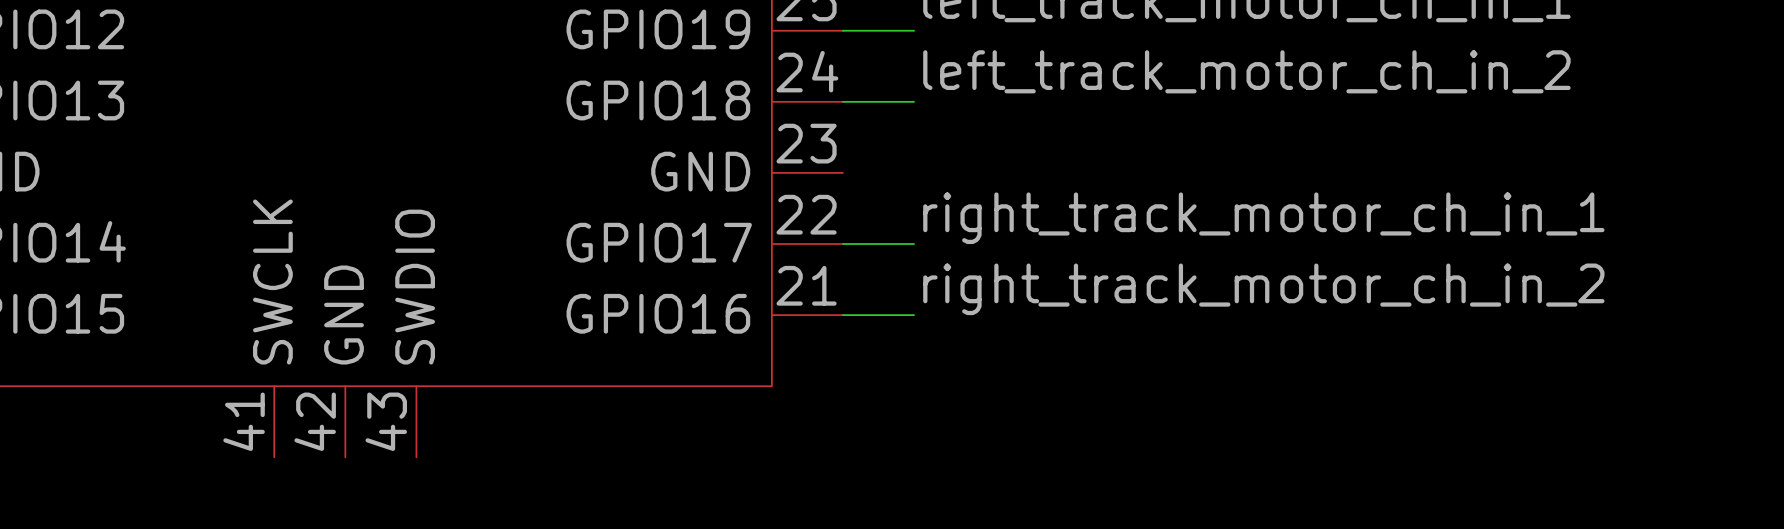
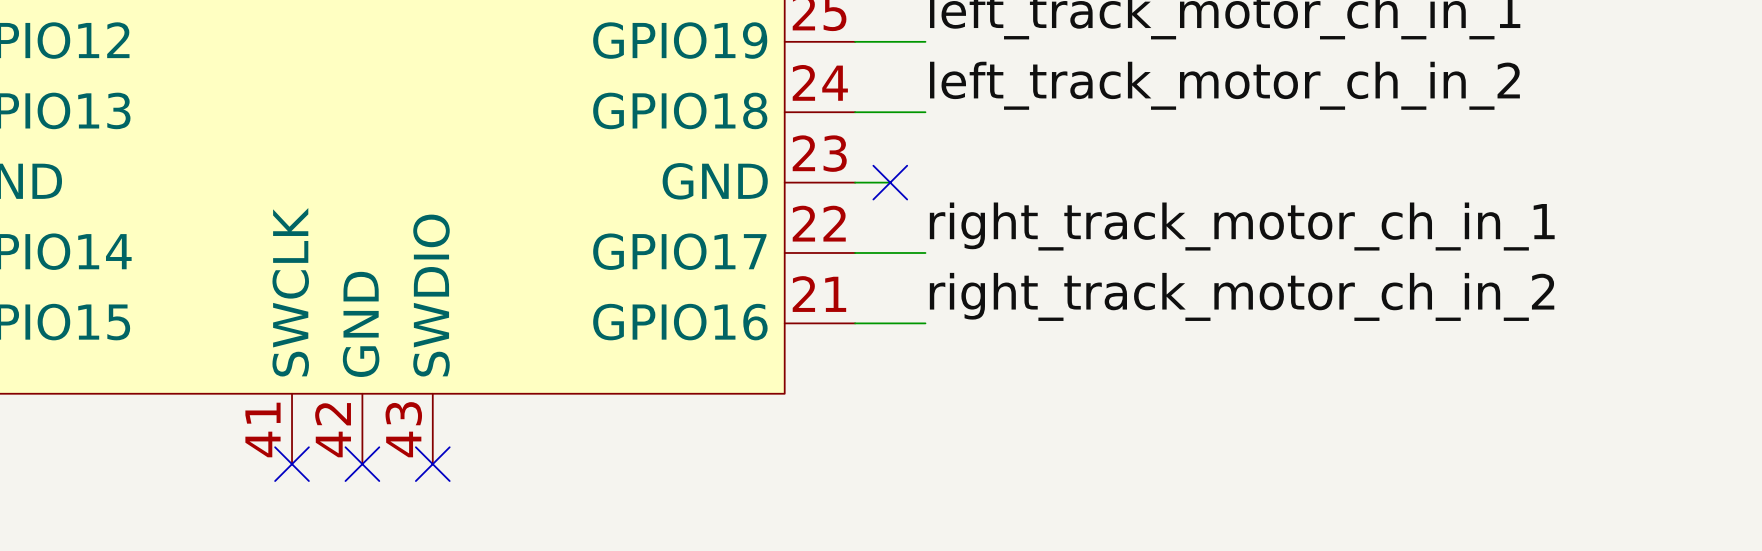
wire: none -> (855, 182) (890, 182)
no-connect mark: none -> (890, 182)
no-connect mark: none -> (292, 464)
no-connect mark: none -> (362, 464)
no-connect mark: none -> (432, 464)

